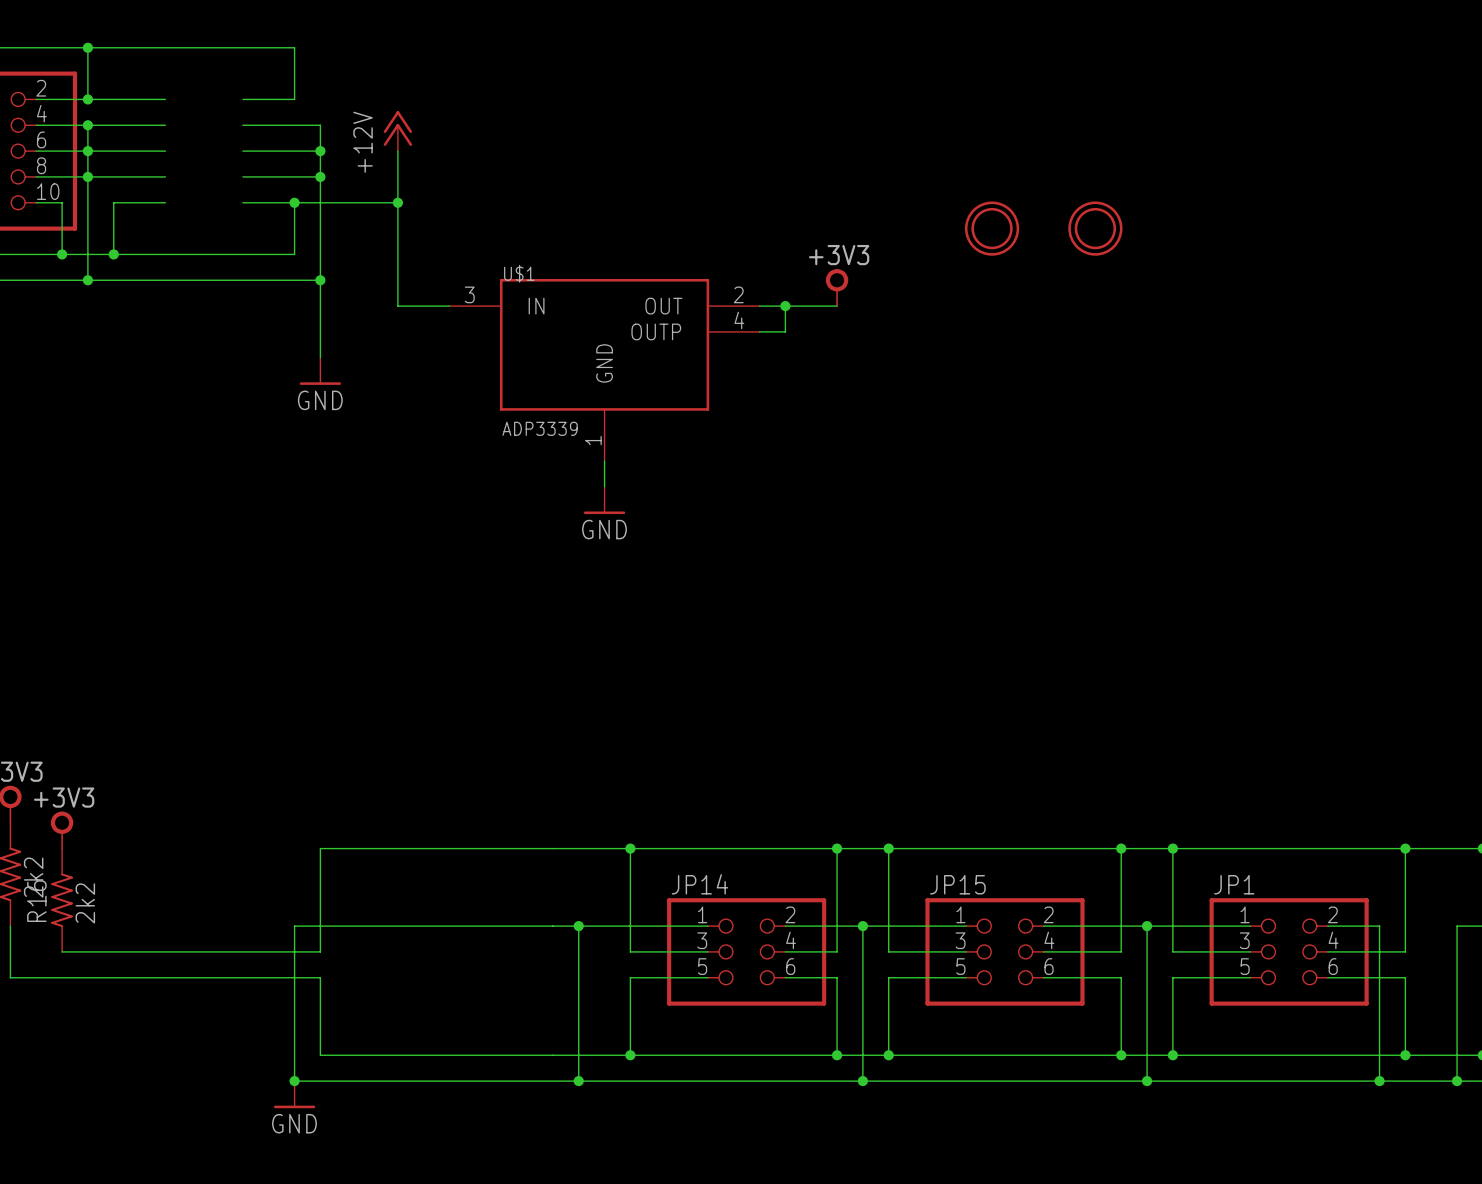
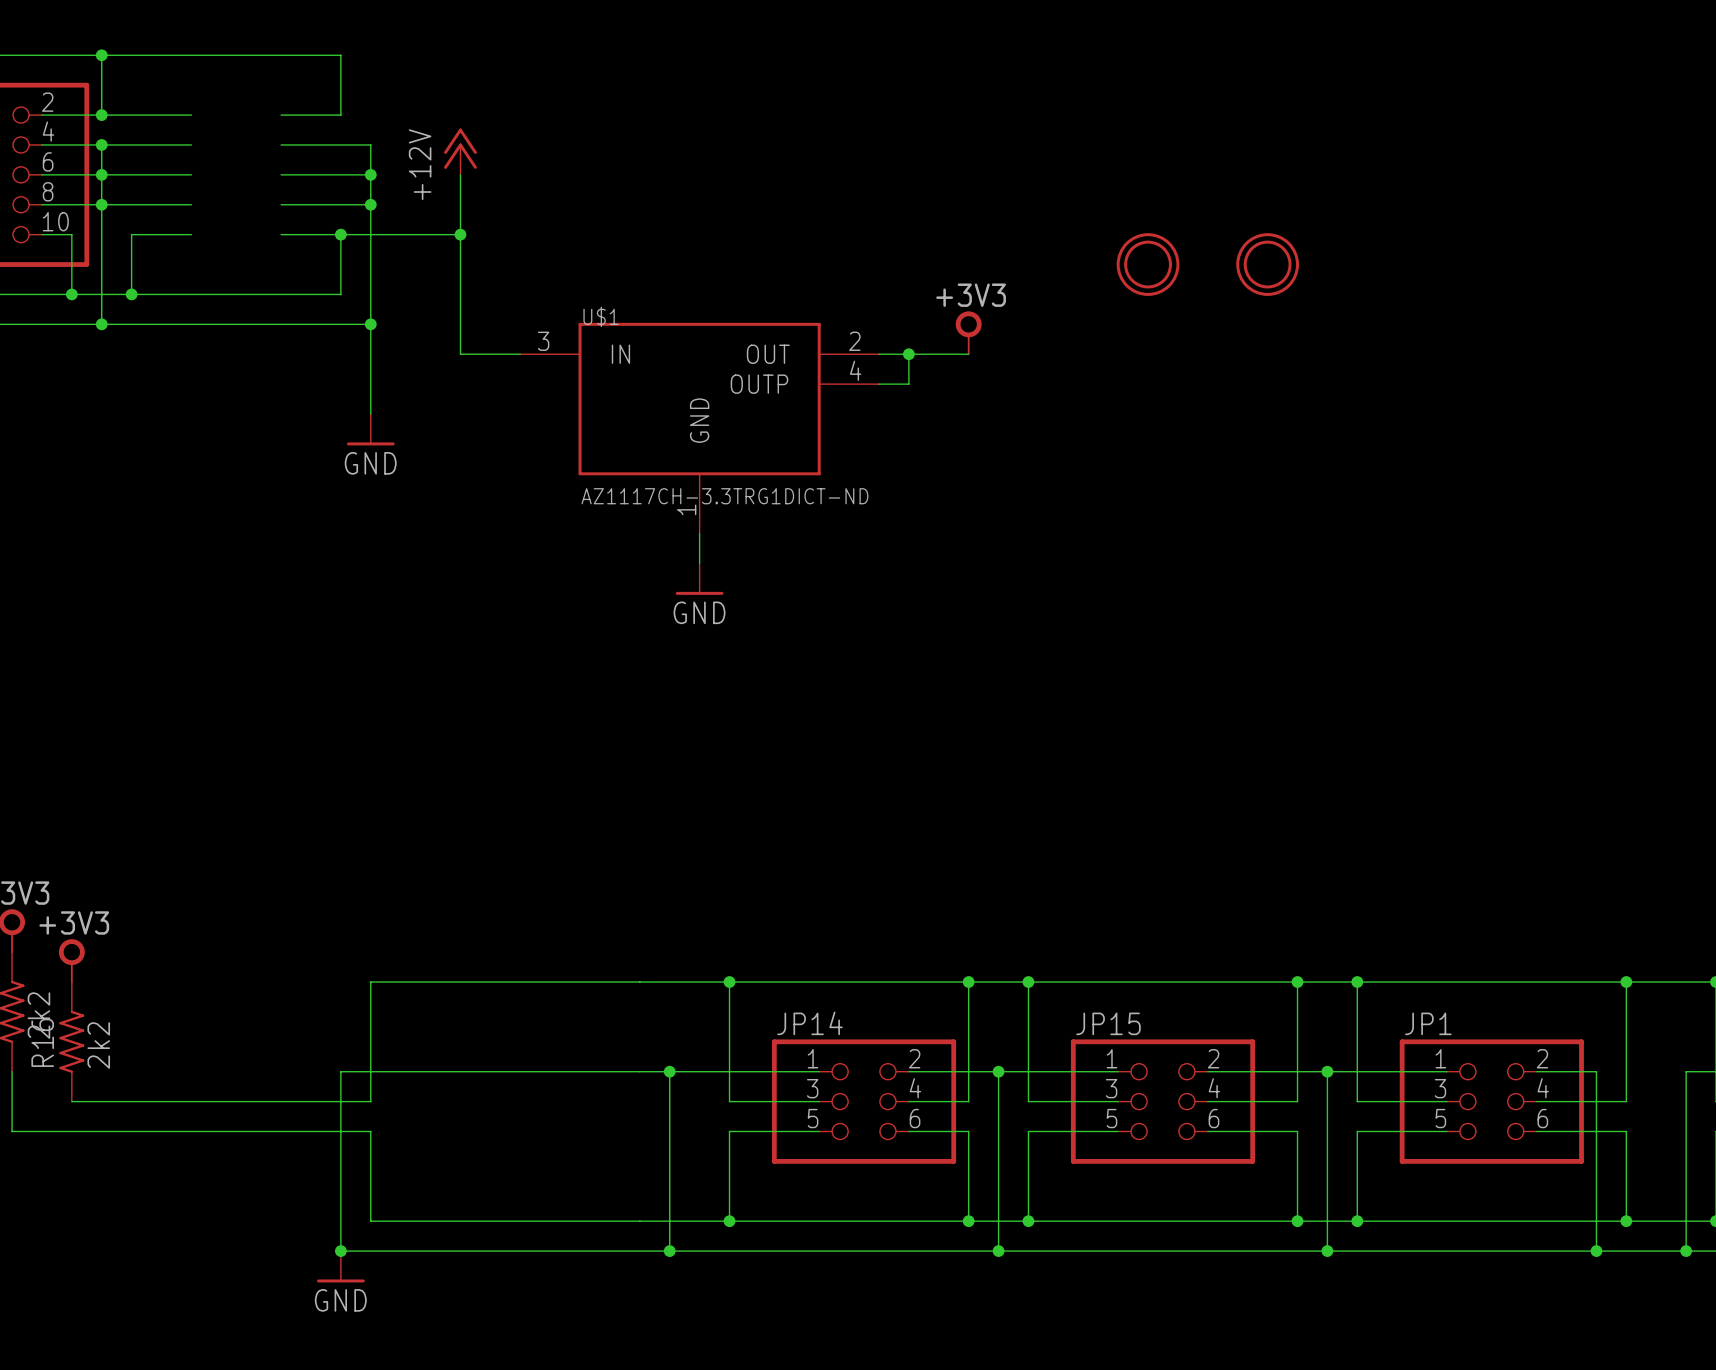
U$1 value: ADP3339 (540, 428) -> AZ1117CH-3.3TRG1DICT-ND (724, 496)

